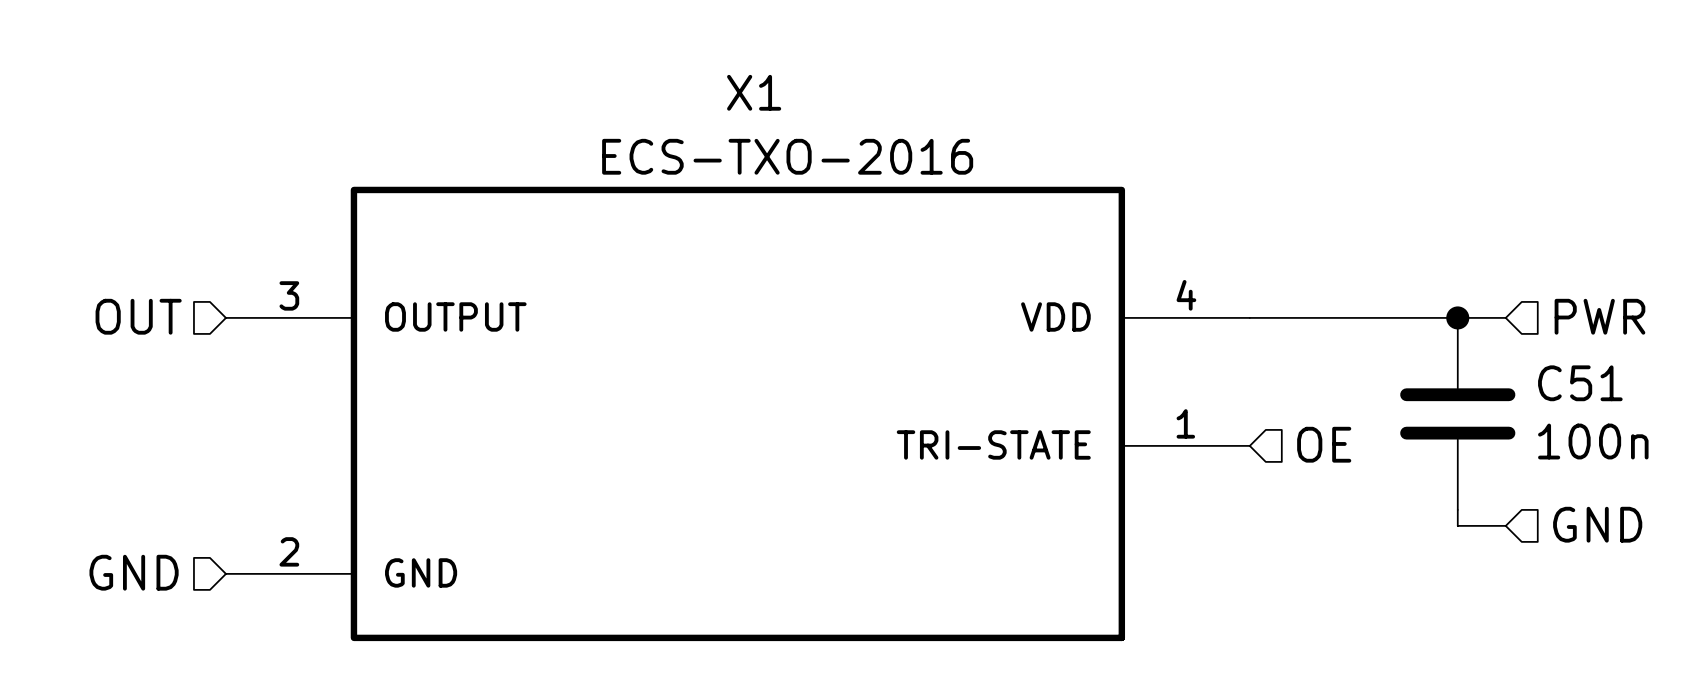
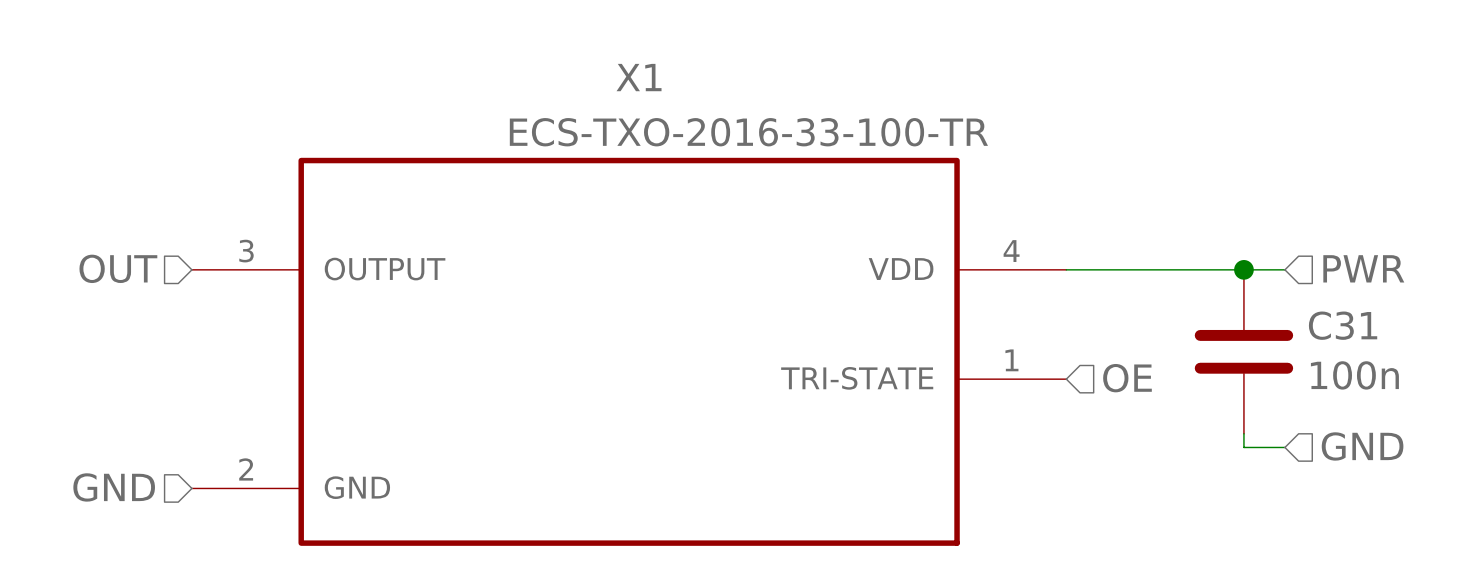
X1 value: ECS-TXO-2016 (787, 156) -> ECS-TXO-2016-33-100-TR (748, 132)
C51 name: C51 (1580, 383) -> C31 (1343, 325)

